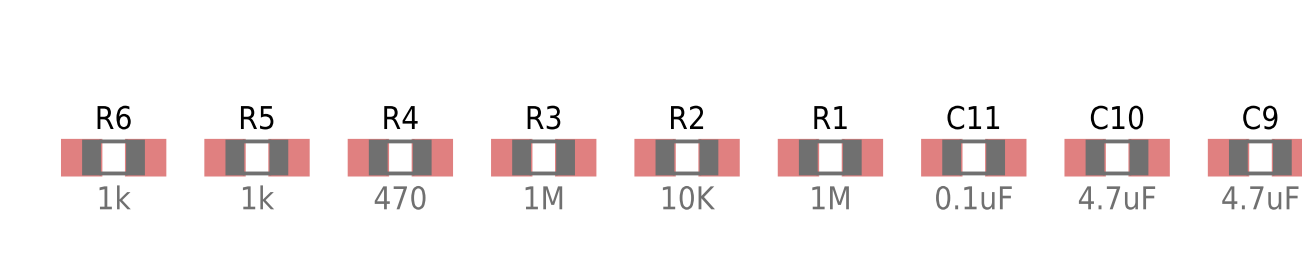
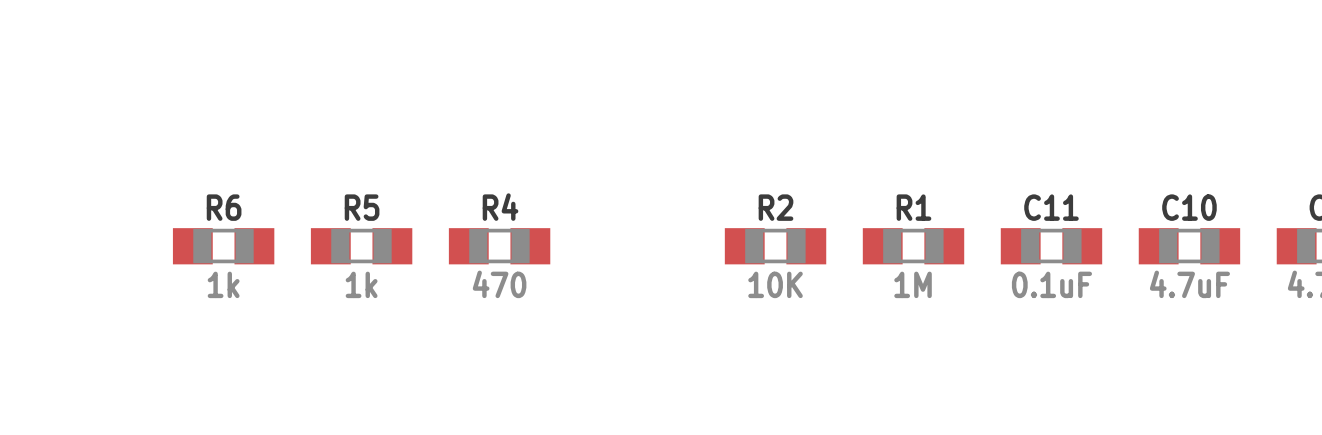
R3: 1M (543, 157) -> none

